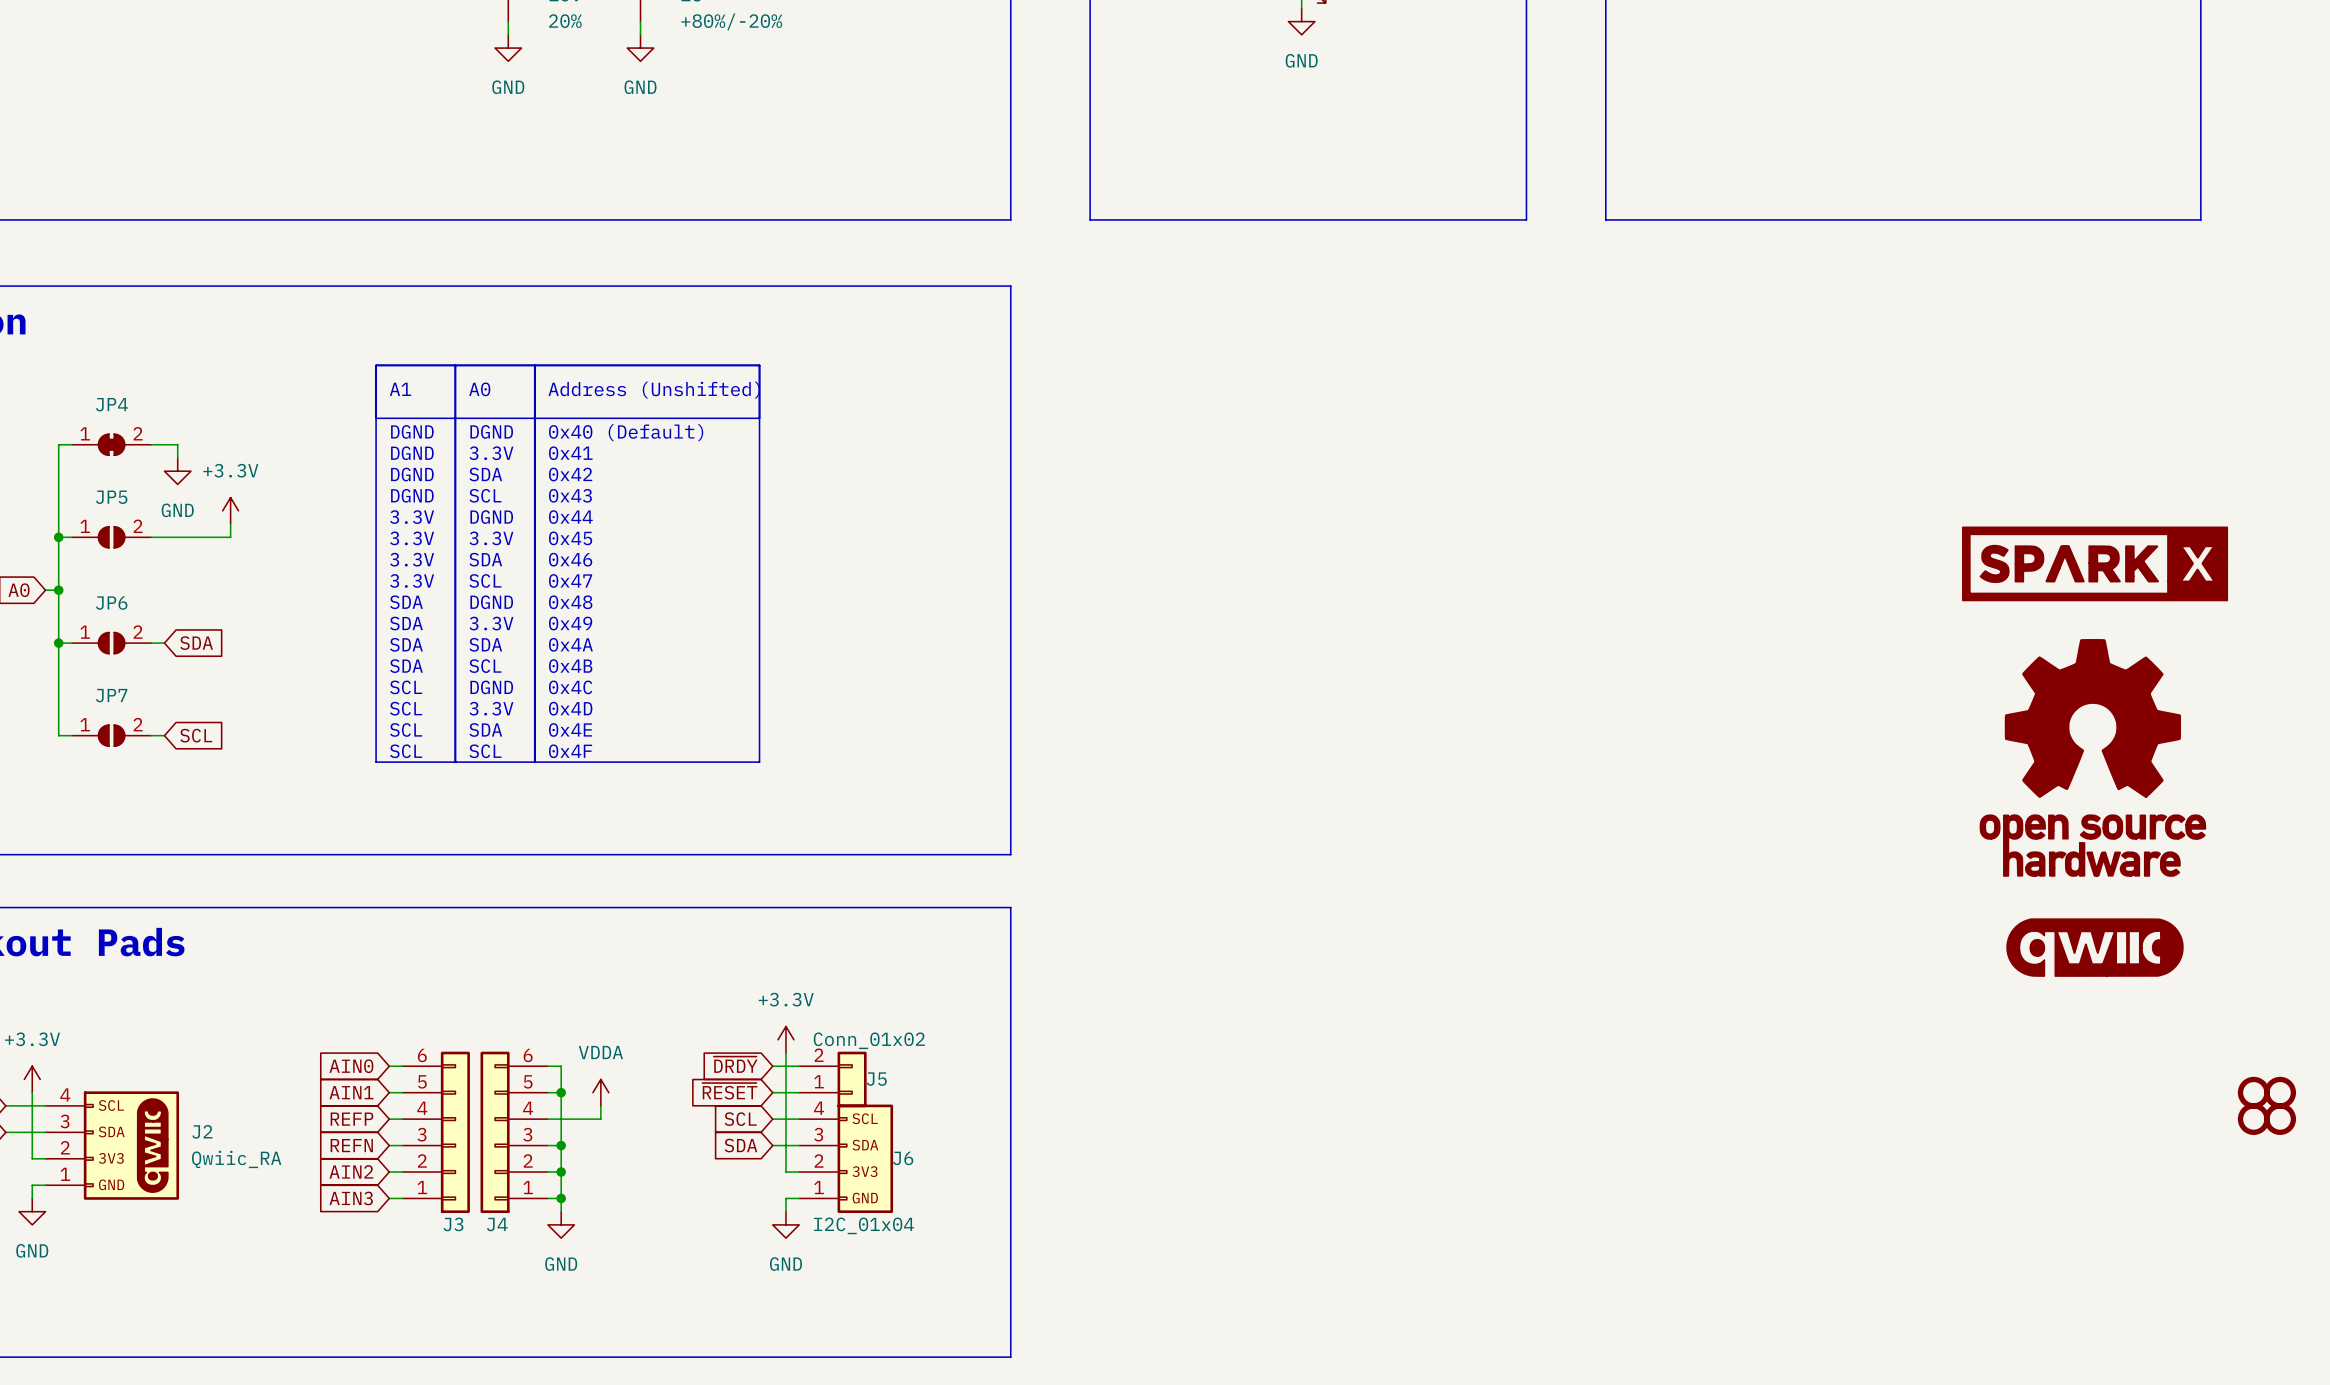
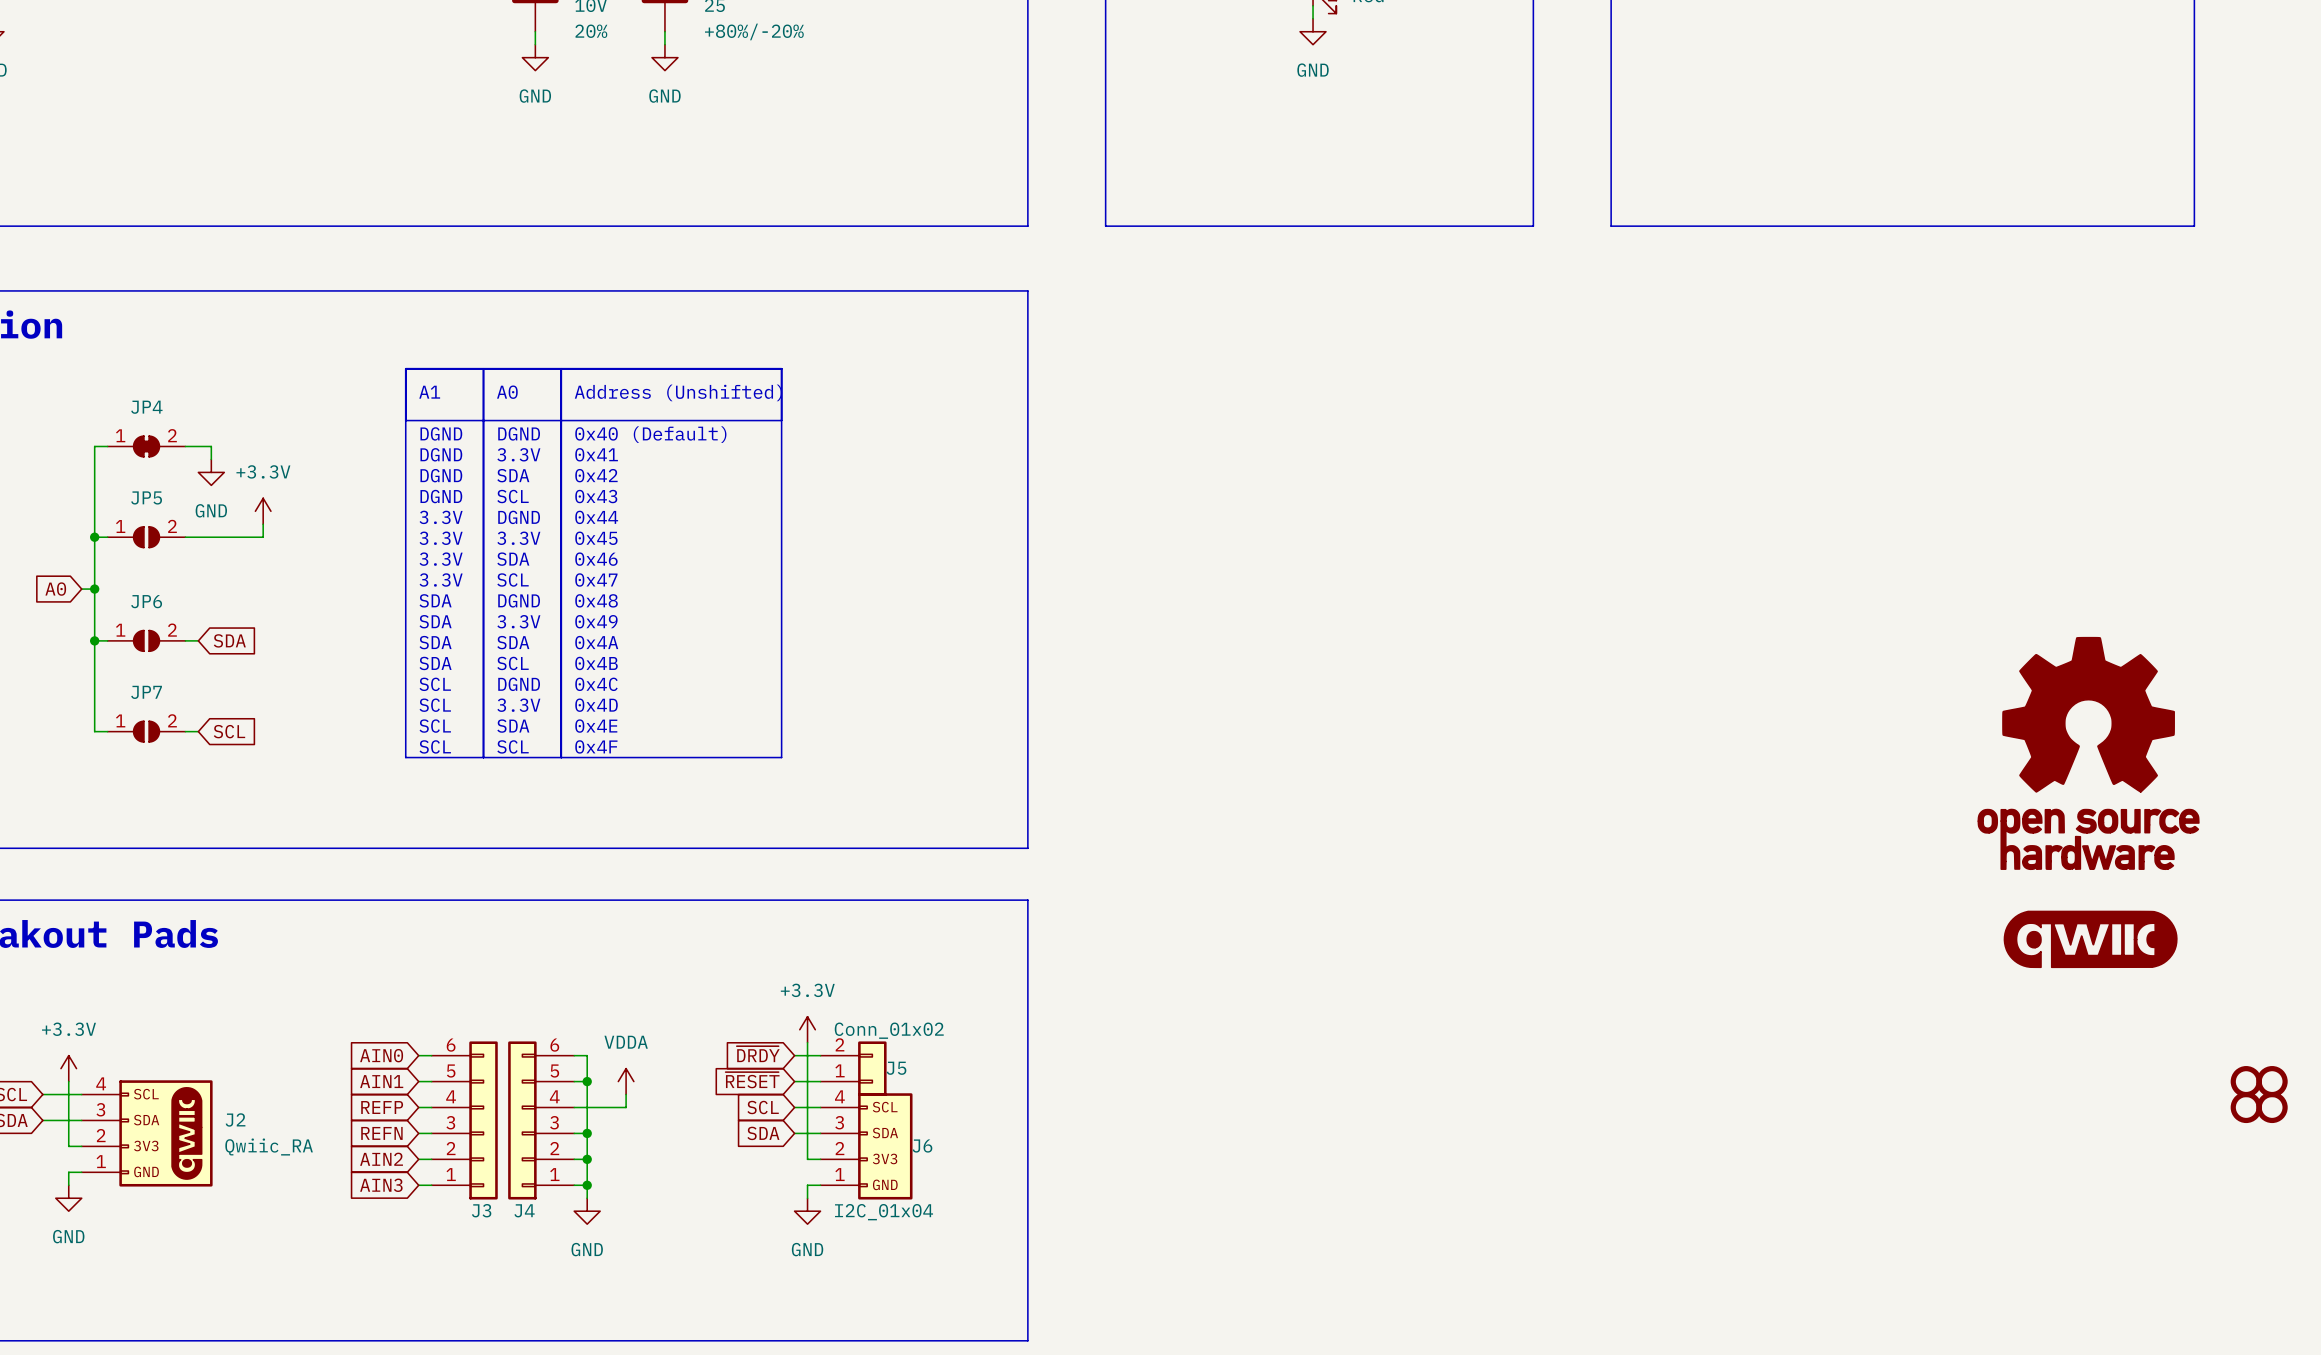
power symbol: (2095, 563) -> none

